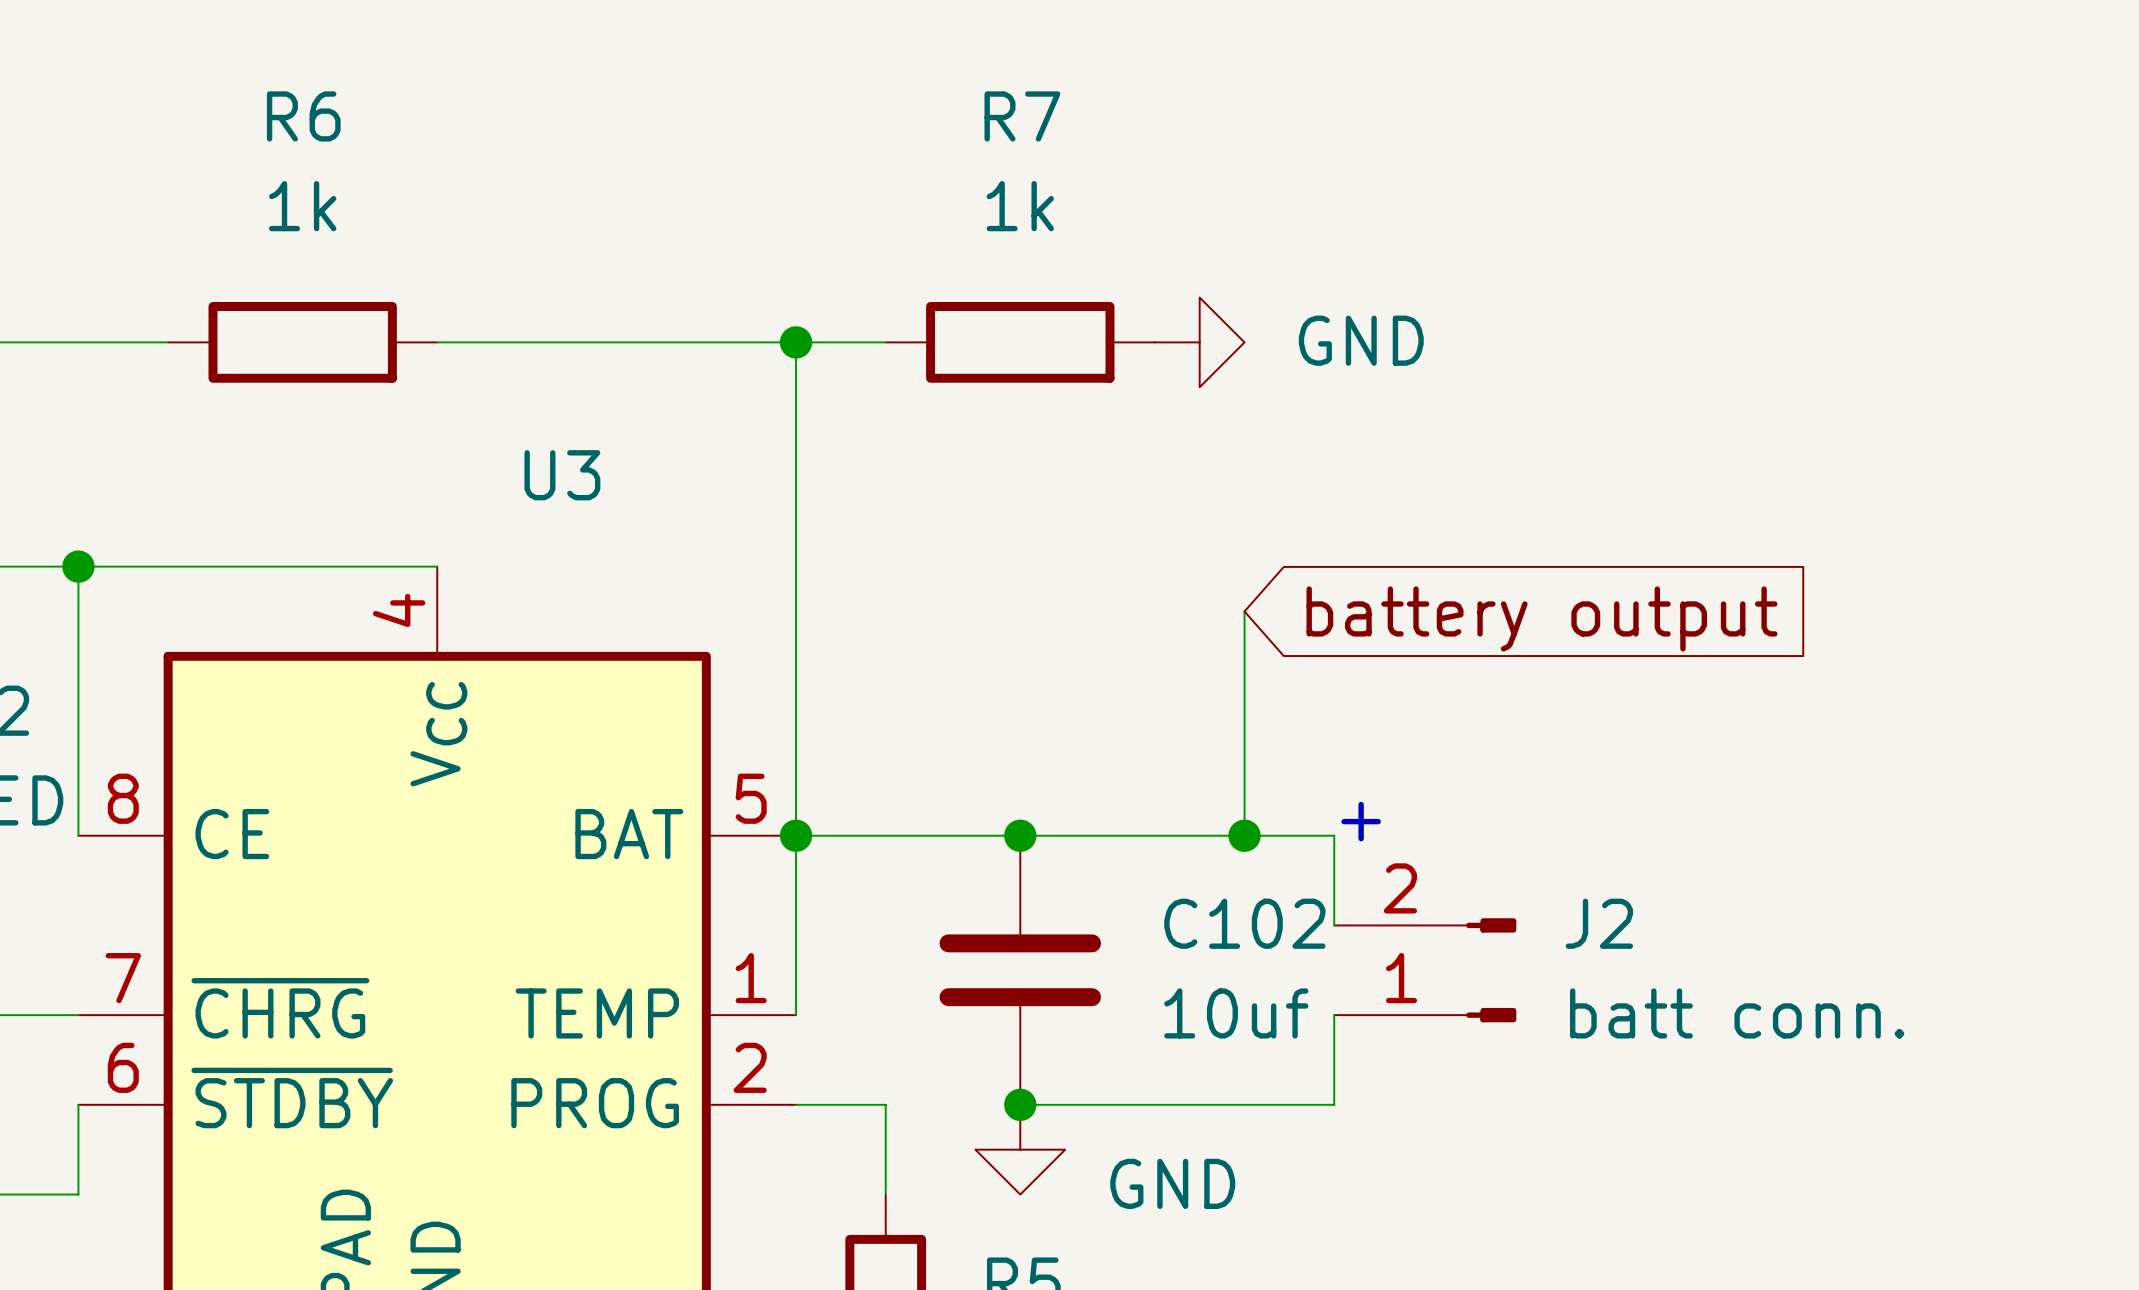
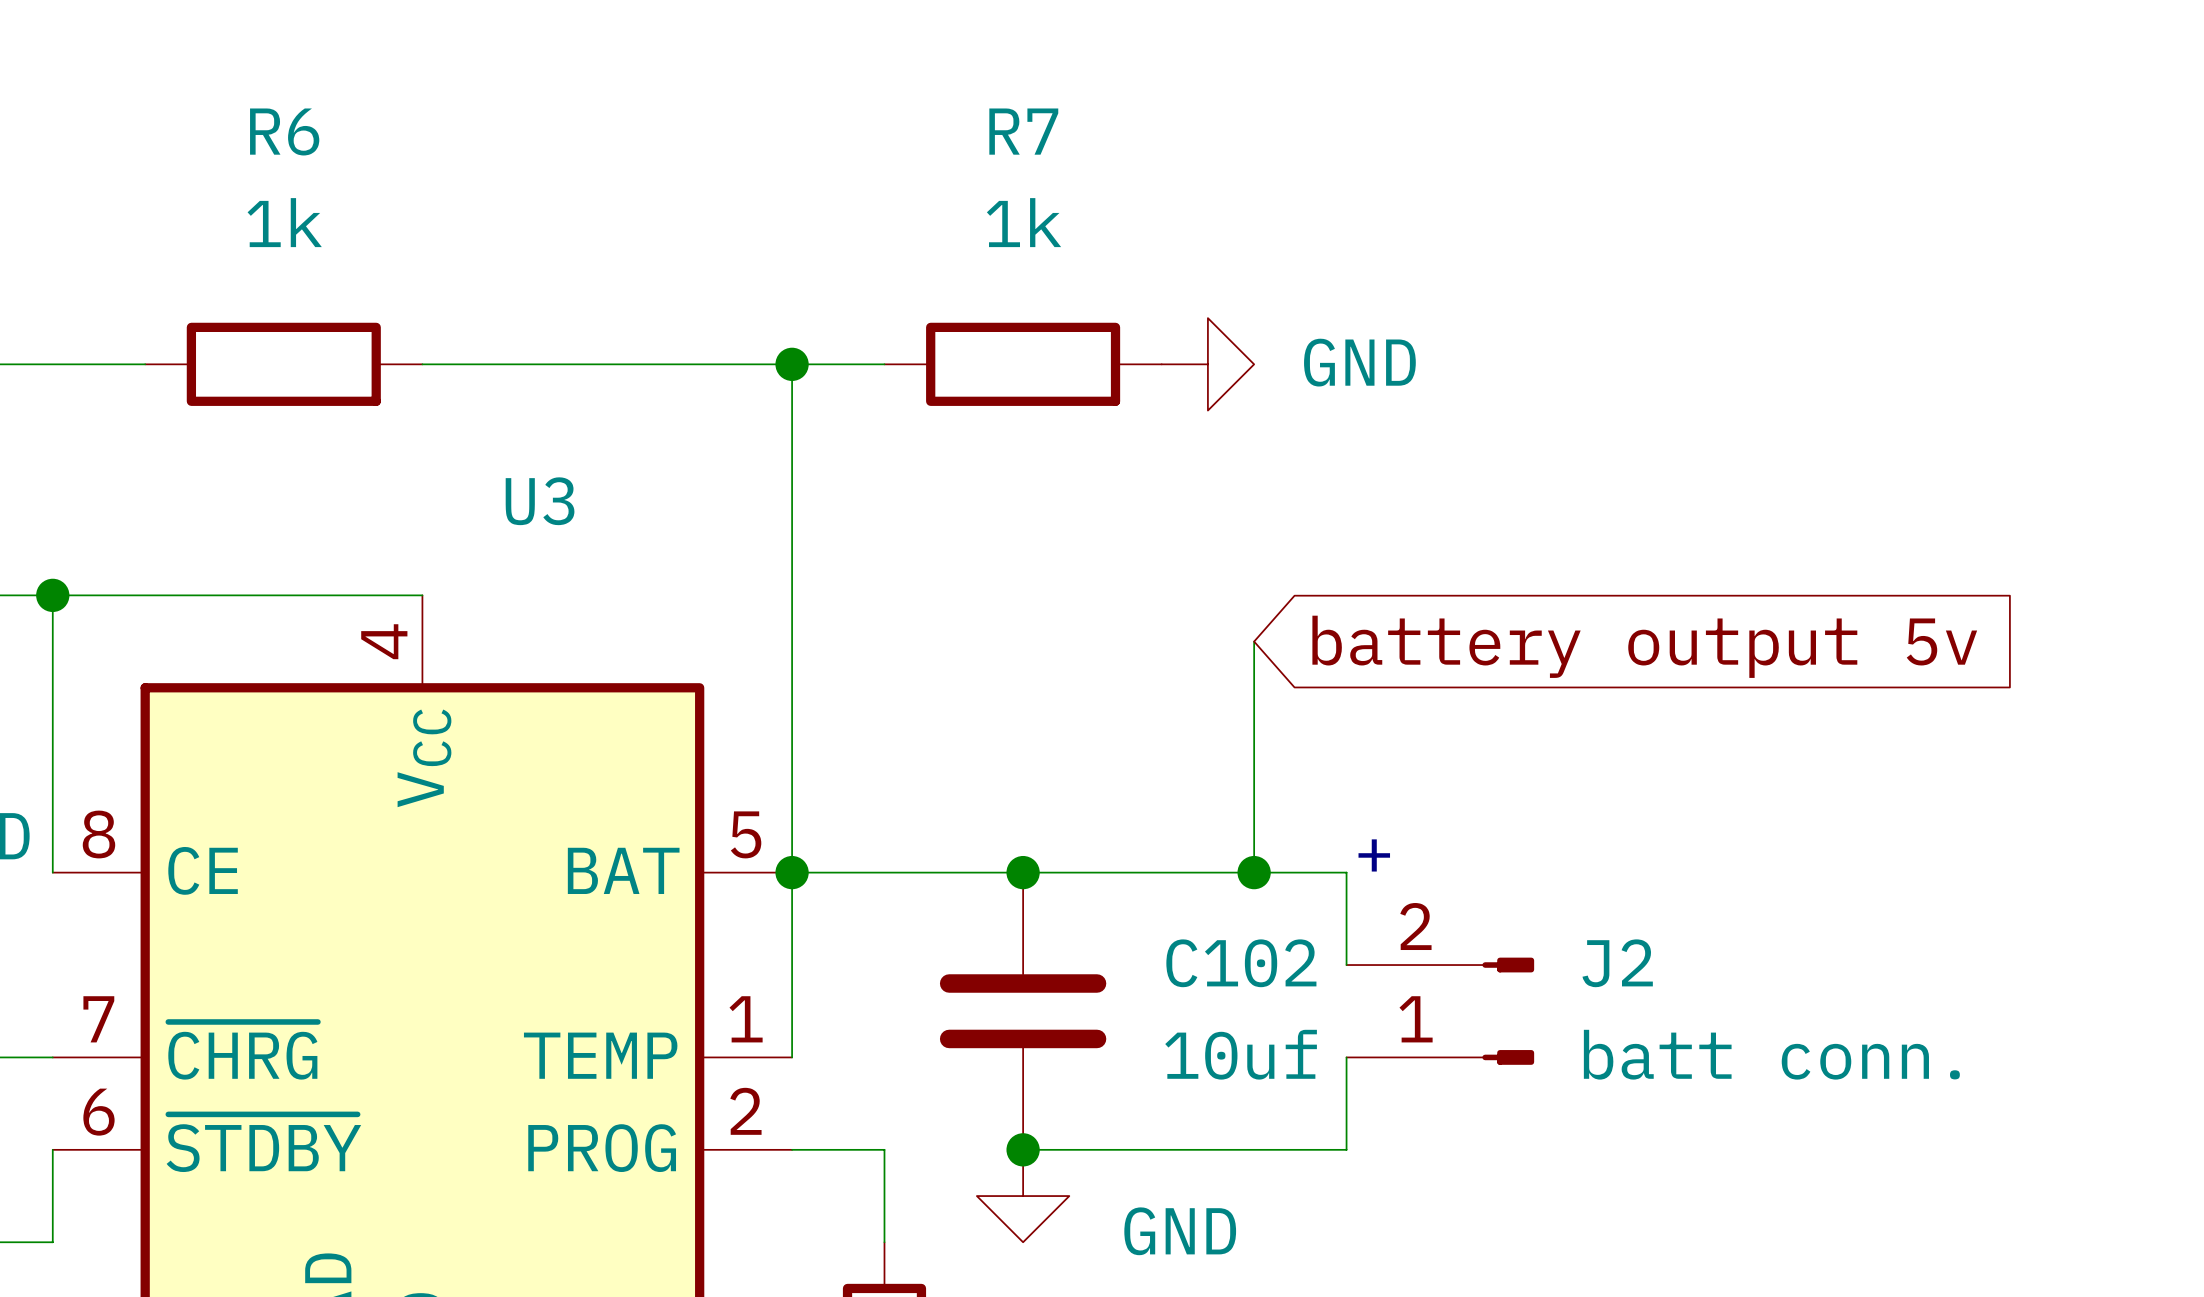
global label: battery output (1541, 618) -> battery output 5v (1644, 646)

